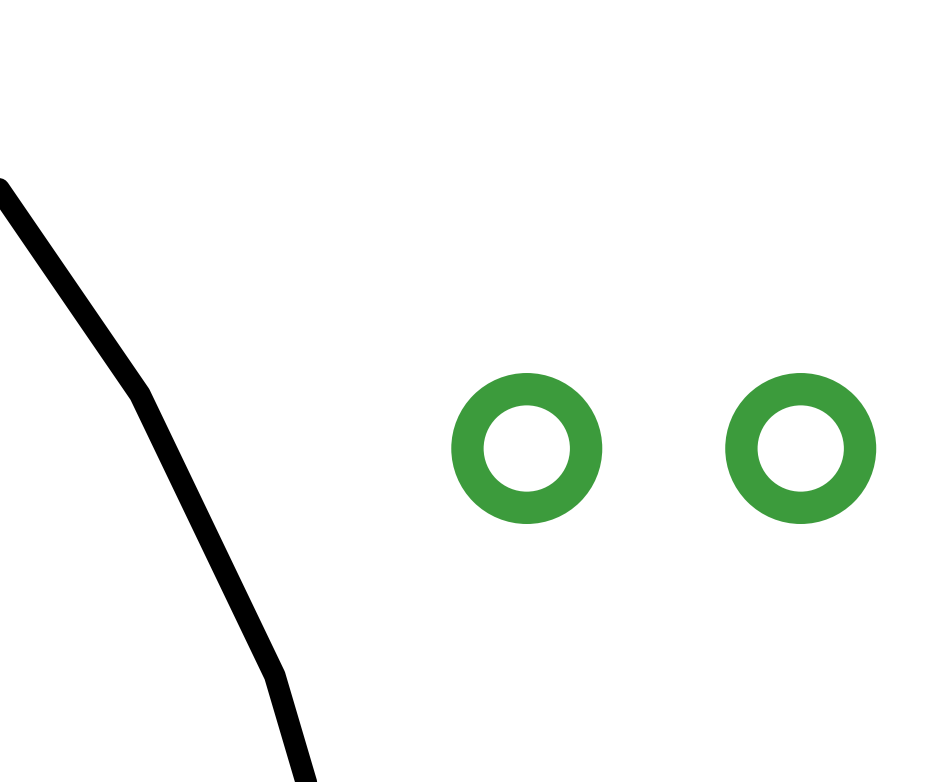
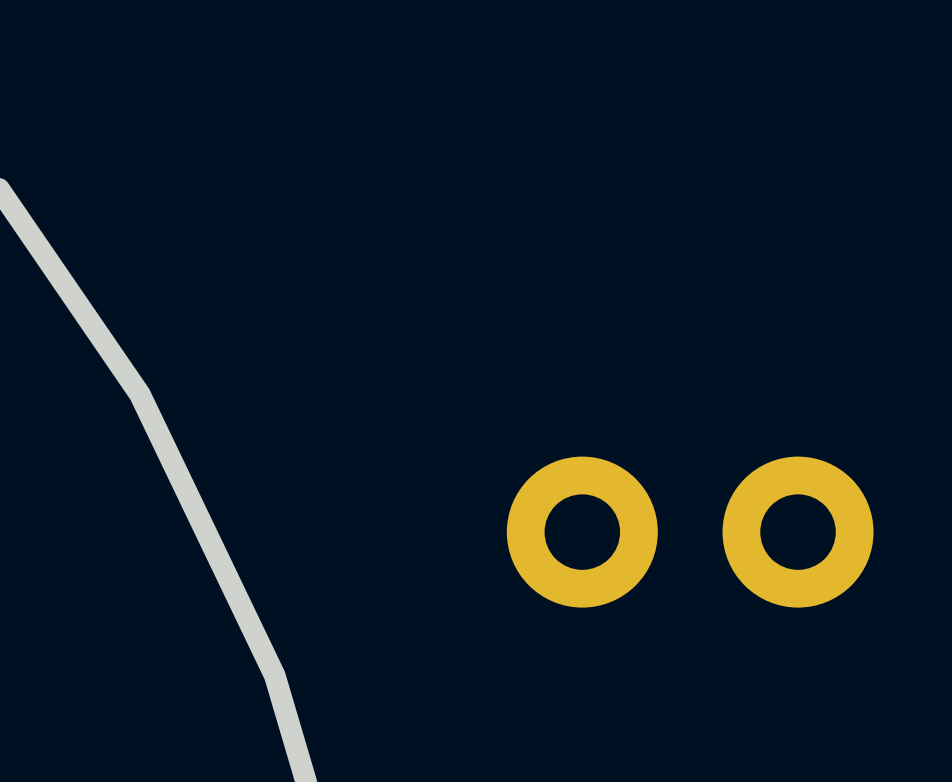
part footprint: [451, 373, 877, 525] -> [506, 456, 874, 608]

